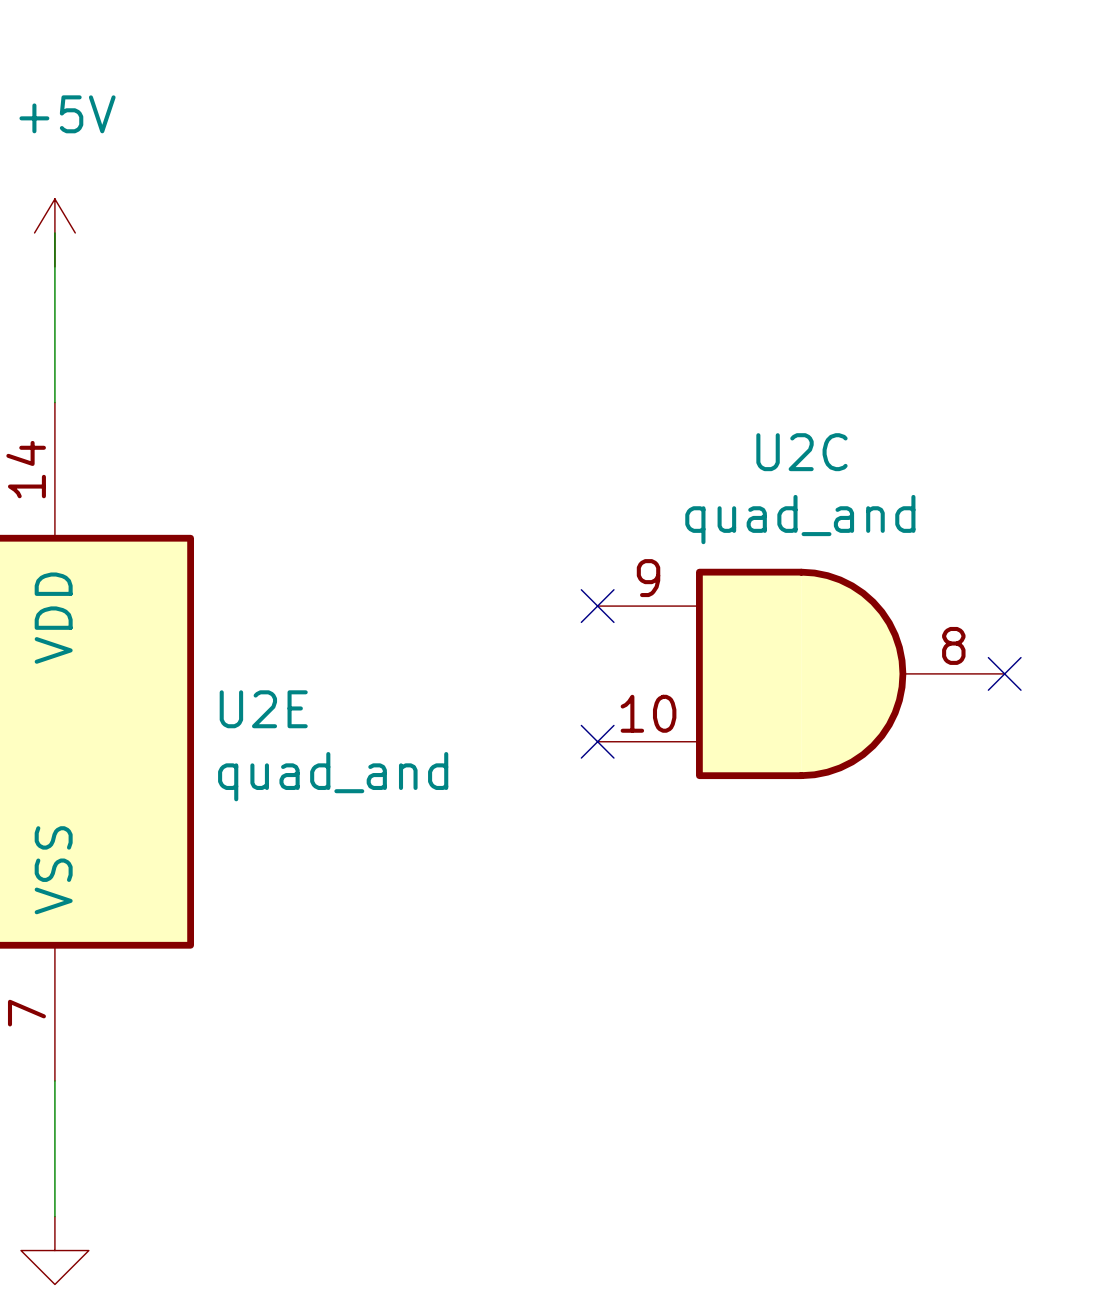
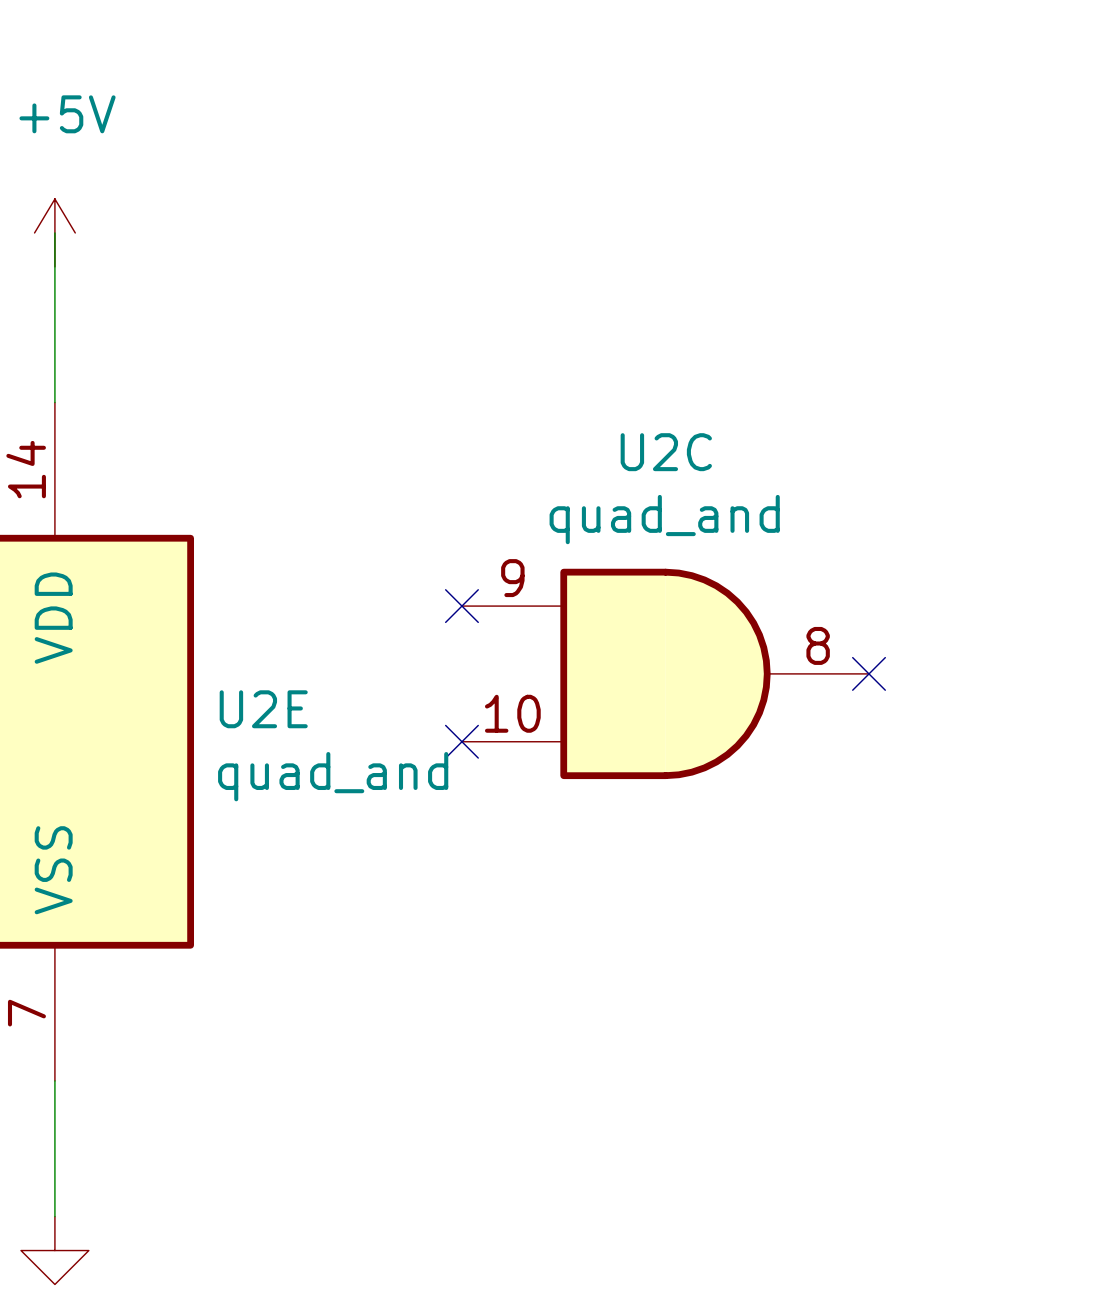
no-connect mark: none -> (461, 606)
no-connect mark: (597, 606) -> none
U2C position: (801, 673) -> (665, 673)
no-connect mark position: (1004, 673) -> (869, 673)
no-connect mark: none -> (461, 741)
no-connect mark: (597, 741) -> none

